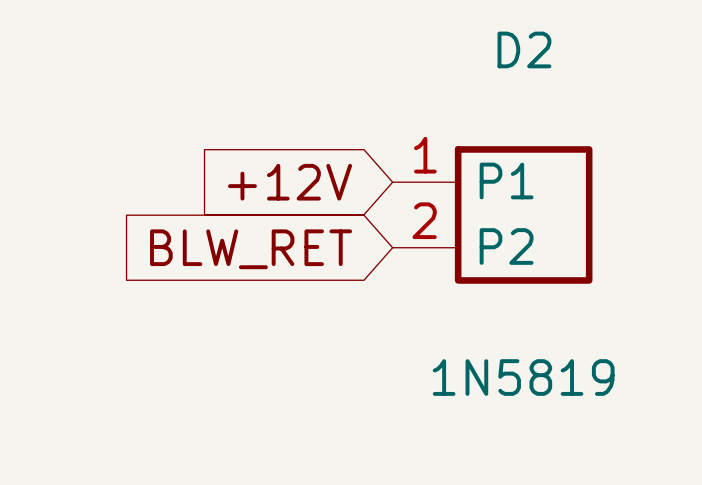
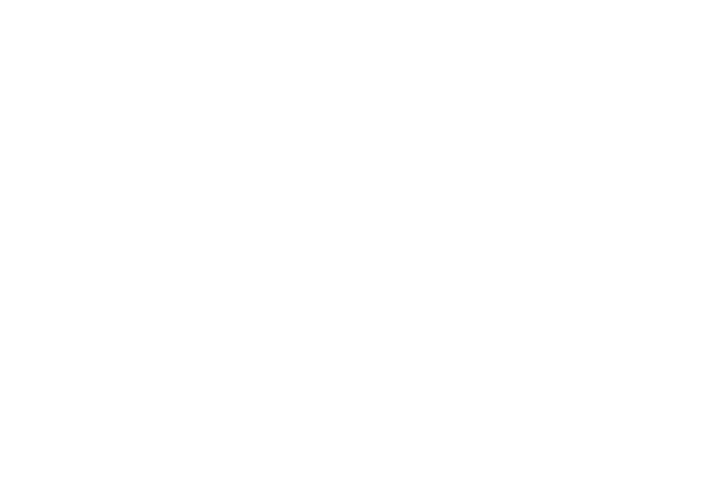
global label: +12V (290, 182) -> none
D2: 1N5819 (492, 214) -> none
global label: BLW_RET (251, 249) -> none

